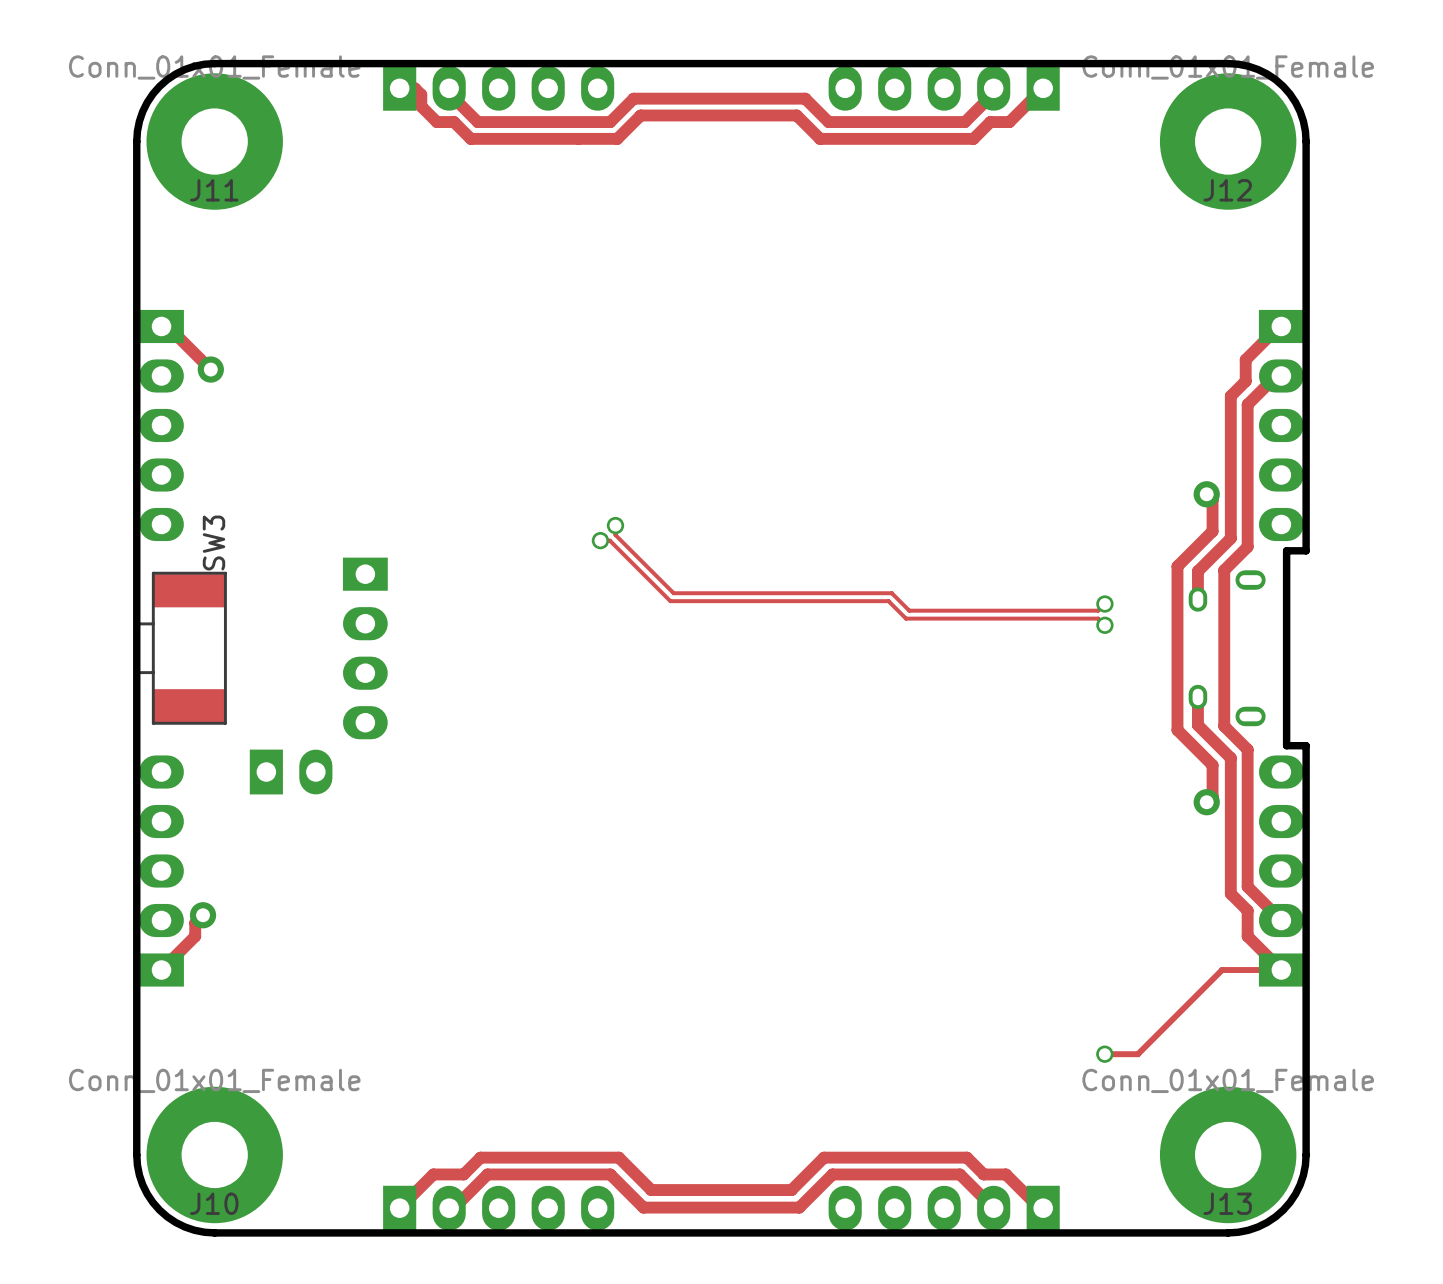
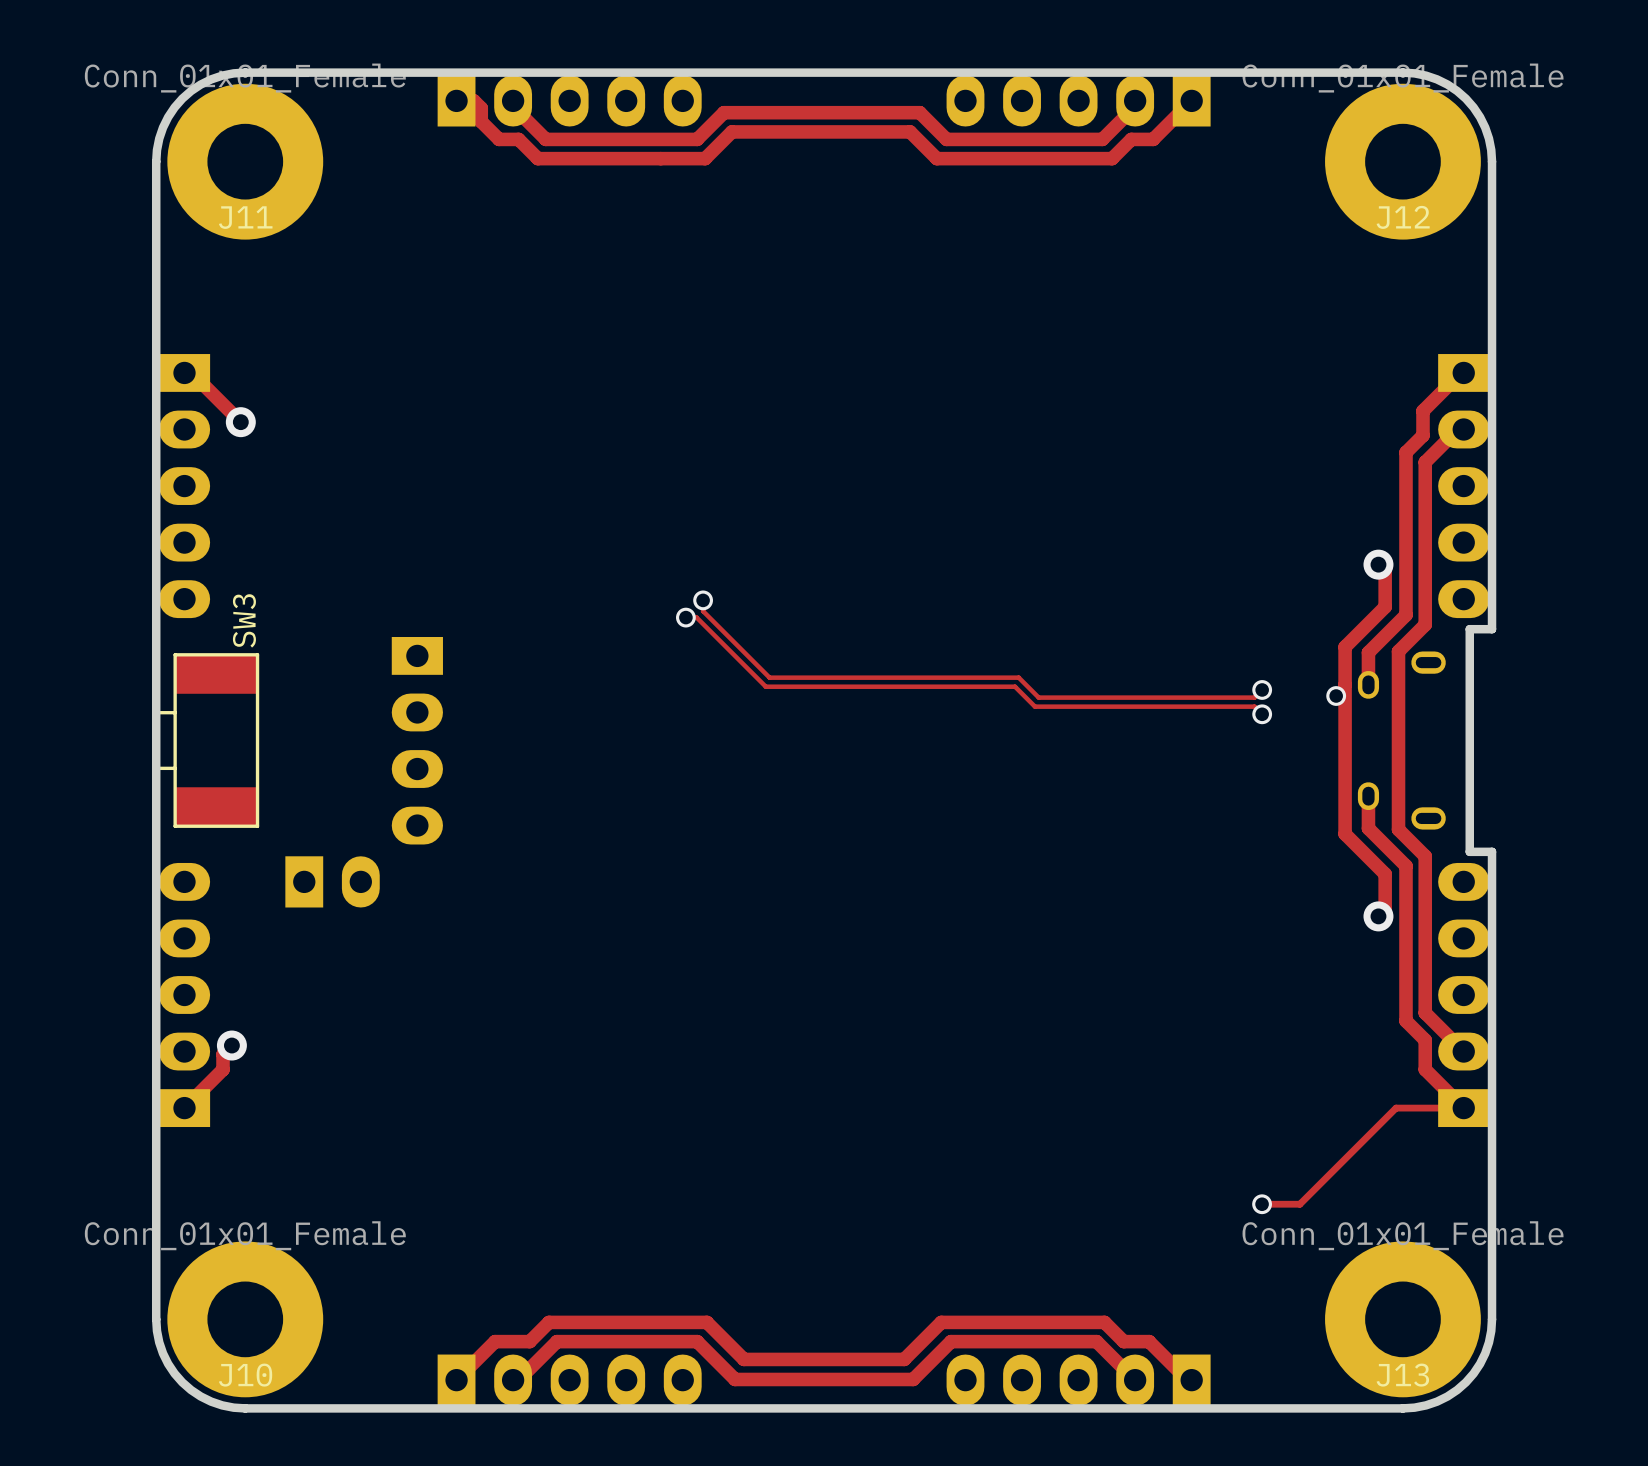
via: none -> (1336, 695)

